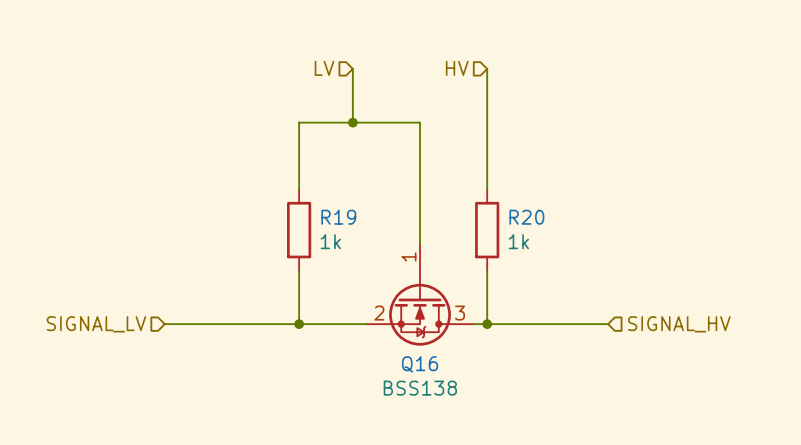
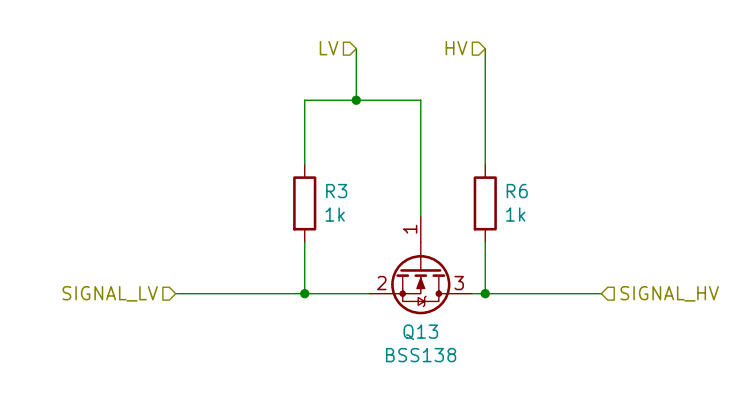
R19 name: R19 (338, 217) -> R3 (336, 191)
R20 name: R20 (526, 217) -> R6 (517, 191)
Q16 name: Q16 (420, 364) -> Q13 (420, 332)

